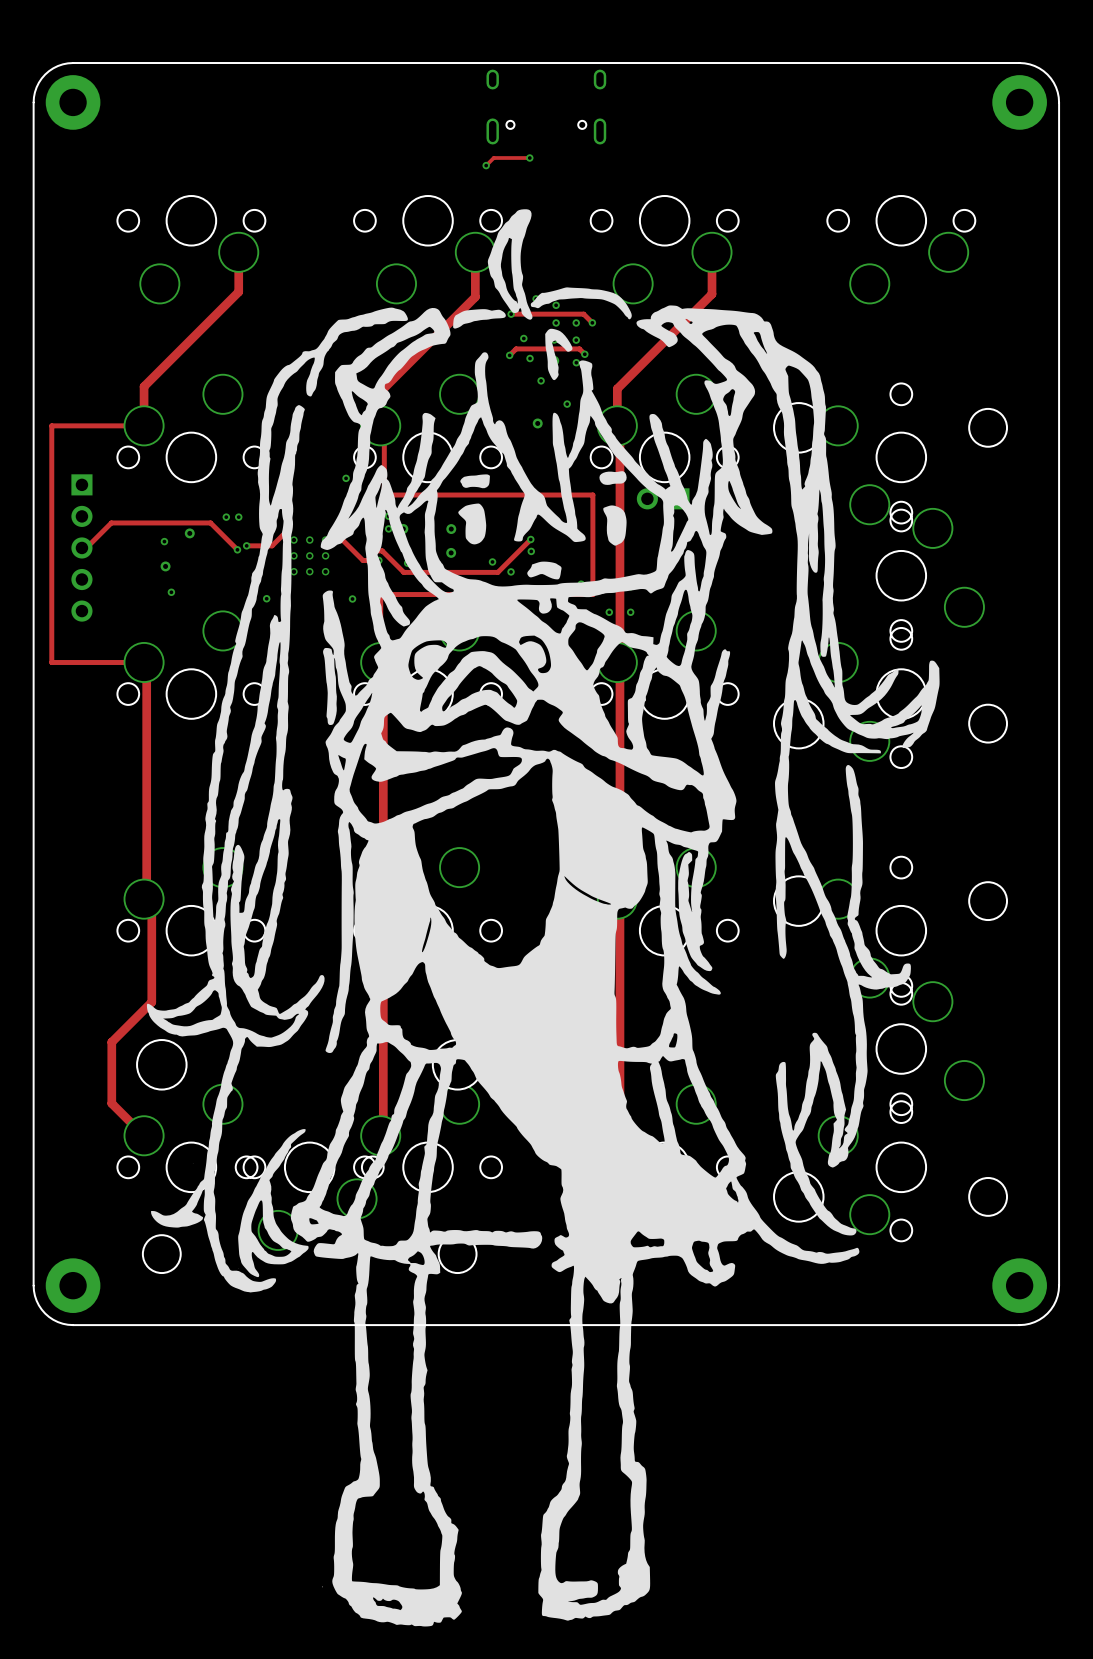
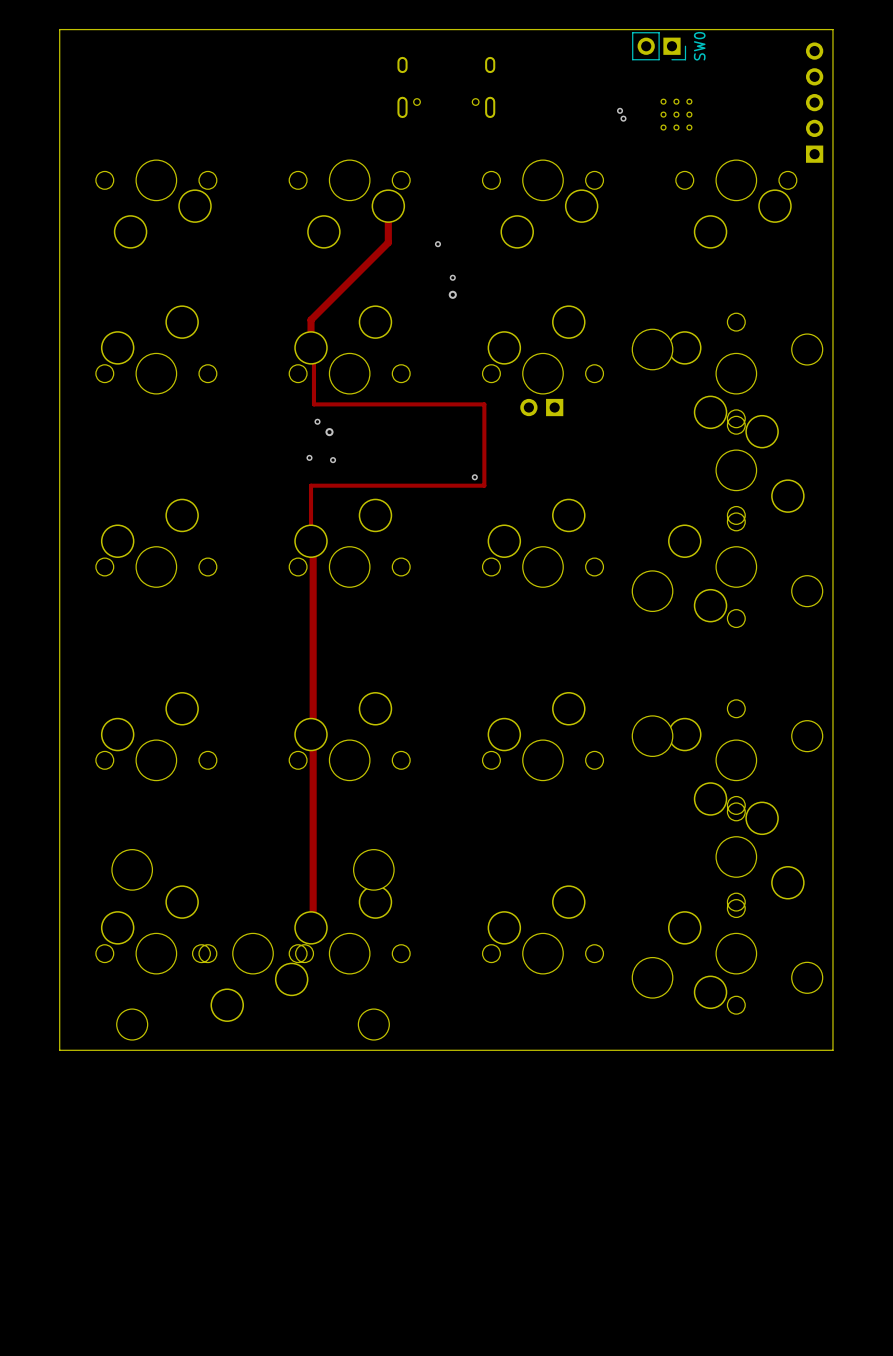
SW0: none -> (659, 46)
board edge: (73, 63) (1019, 63) (1034, 66) (1050, 78) (1056, 87) (1059, 102) (1059, 1285) (1053, 1305) (1043, 1316) (1029, 1323) (1019, 1325) (73, 1325) (53, 1319) (41, 1309) (34, 1295) (33, 1285) (33, 102) (36, 87) (45, 74) (57, 66) (73, 63) -> (59, 29) (59, 1050) (832, 1050) (832, 29) (59, 29)
part: (73, 102) -> none
part: (1019, 102) -> none
part: none -> (814, 102)
via: none -> (620, 110)
part: none -> (676, 114)
via: none -> (623, 118)
track: (529, 158) (493, 158) (486, 165) -> none
via: (529, 158) -> none
via: (486, 165) -> none
drawing: [146, 209, 940, 1627] -> none
track: (238, 252) (238, 291) (144, 386) (144, 425) (51, 425) (51, 662) (144, 662) (146, 665) (146, 896) (144, 899) (151, 906) (151, 1002) (111, 1042) (111, 1103) (144, 1135) -> none
track: (712, 252) (712, 294) (617, 388) (617, 425) (619, 428) (619, 659) (617, 662) (619, 665) (619, 896) (617, 899) (619, 901) (619, 1133) (617, 1135) -> none
via: (556, 305) -> none
track: (511, 314) (583, 314) (592, 322) -> none
via: (511, 314) -> none
via: (556, 322) -> none
via: (576, 322) -> none
via: (592, 322) -> none
via: (523, 338) -> none
via: (576, 340) -> none
track: (584, 354) (579, 348) (516, 348) (509, 355) -> none
via: (584, 354) -> none
via: (509, 355) -> none
via: (530, 358) -> none
via: (576, 362) -> none
via: (541, 380) -> none
via: (567, 404) -> none
via: (537, 423) -> none
via: (346, 478) -> none
via: (226, 517) -> none
via: (238, 517) -> none
via: (388, 528) -> none
via: (451, 529) -> none
track: (286, 531) (272, 545) (246, 545) -> none
via: (189, 533) -> none
track: (337, 534) (363, 560) (378, 560) -> none
track: (530, 539) (497, 572) (403, 572) (382, 550) (374, 550) -> none
via: (530, 539) -> none
via: (164, 541) -> none
via: (246, 545) -> none
track: (81, 547) (86, 547) (111, 522) (210, 522) (237, 549) -> none
part: (81, 547) -> none
via: (237, 549) -> none
via: (531, 551) -> none
via: (451, 552) -> none
part: (309, 555) -> none
via: (492, 561) -> none
via: (165, 566) -> none
via: (511, 571) -> none
via: (171, 592) -> none
via: (266, 598) -> none
via: (352, 598) -> none
via: (609, 612) -> none
via: (630, 612) -> none
part: (73, 1285) -> none
part: (1019, 1285) -> none

